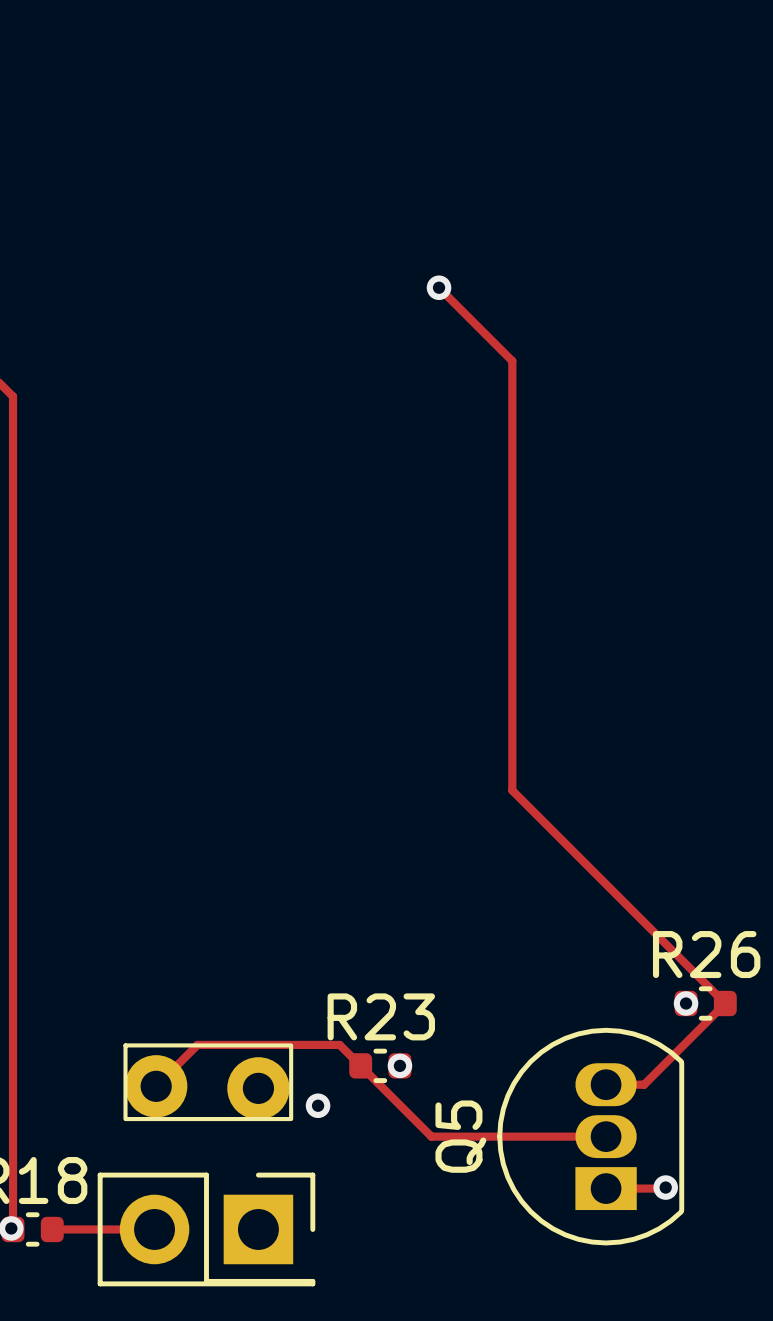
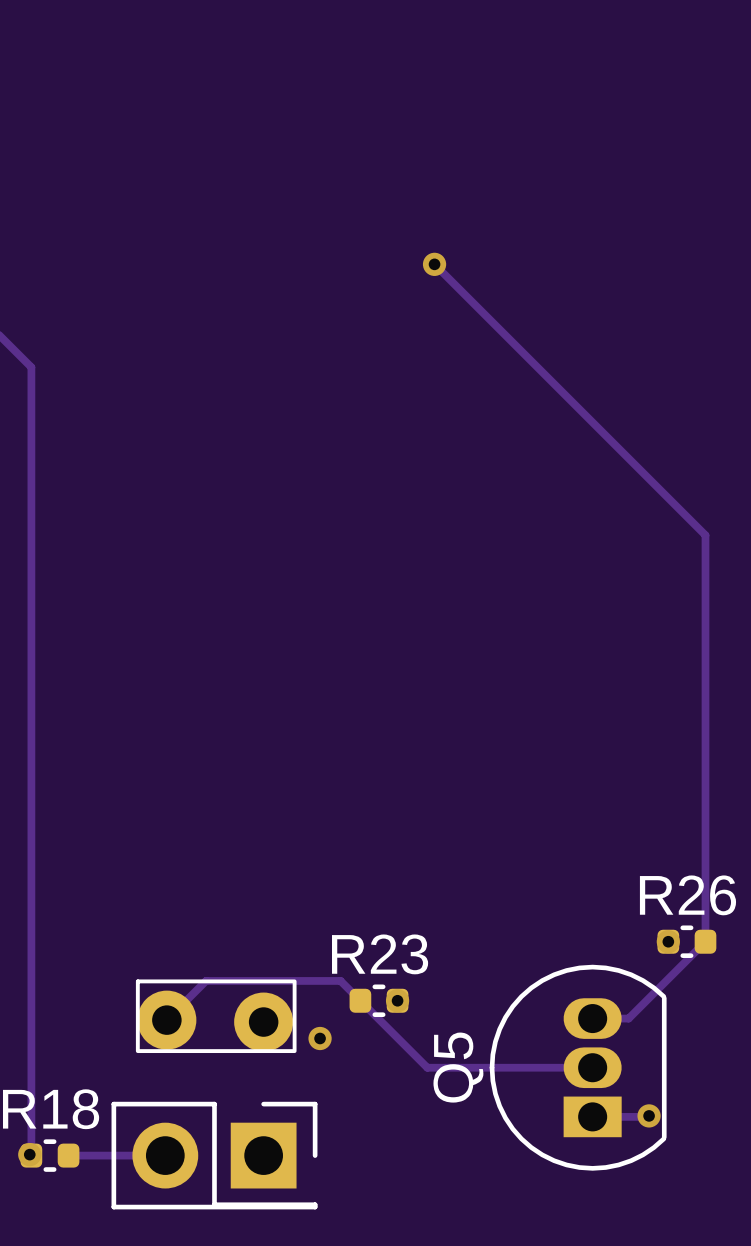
track: (512, 361) (512, 790) (725, 1003) -> (503, 333) (705, 535) (705, 941)

